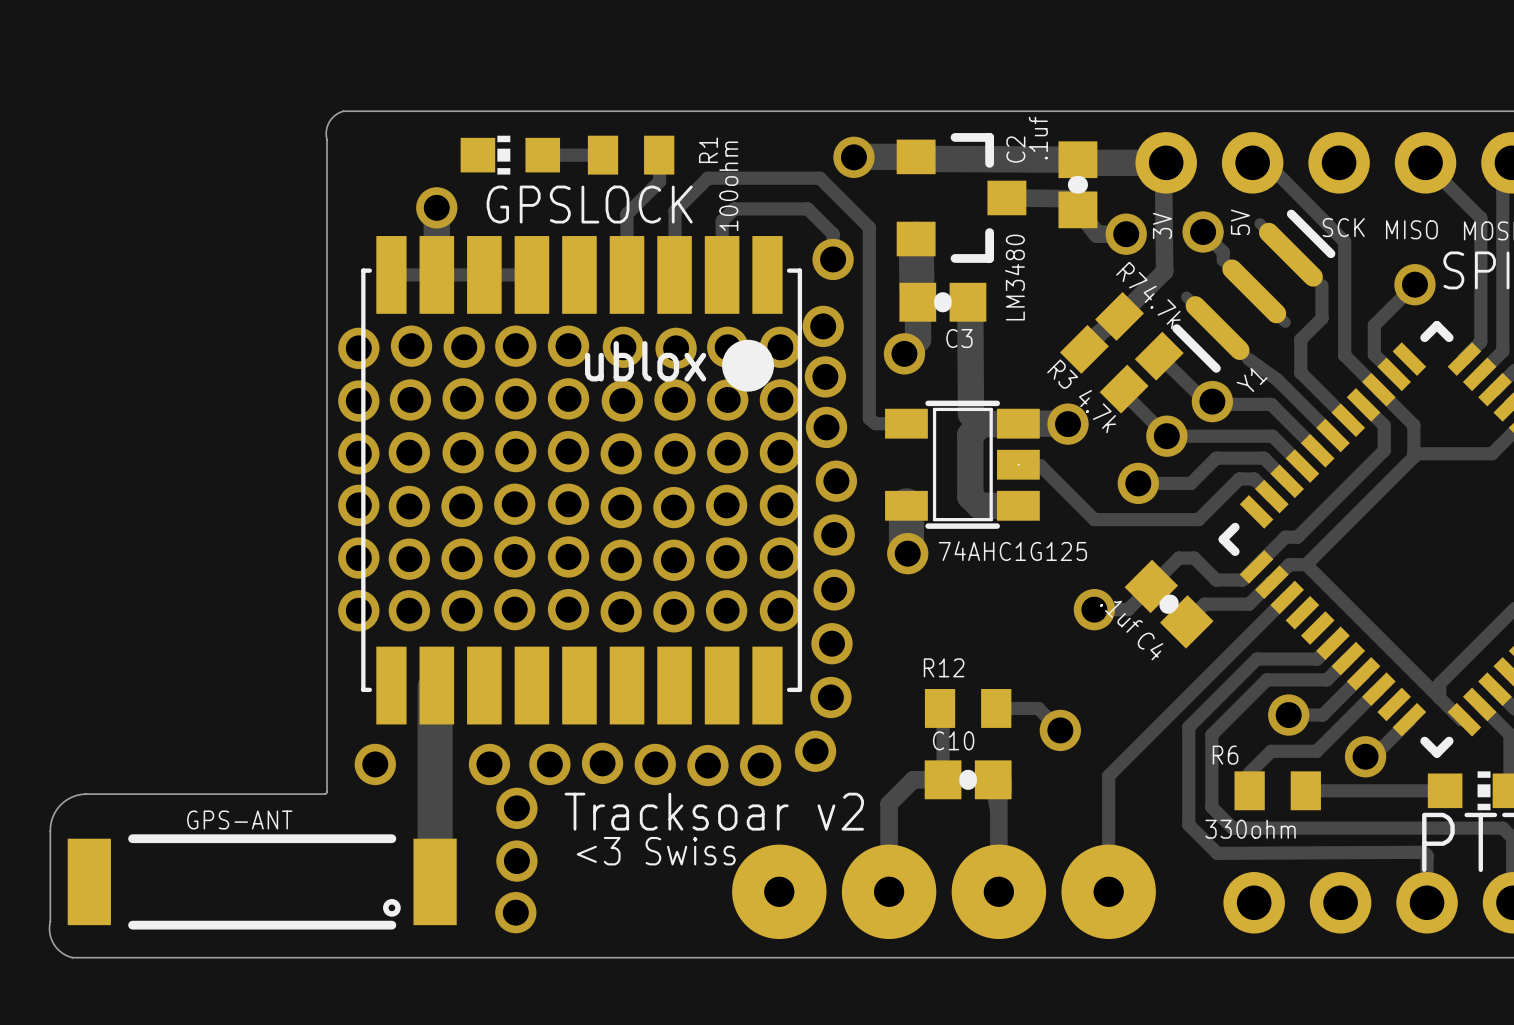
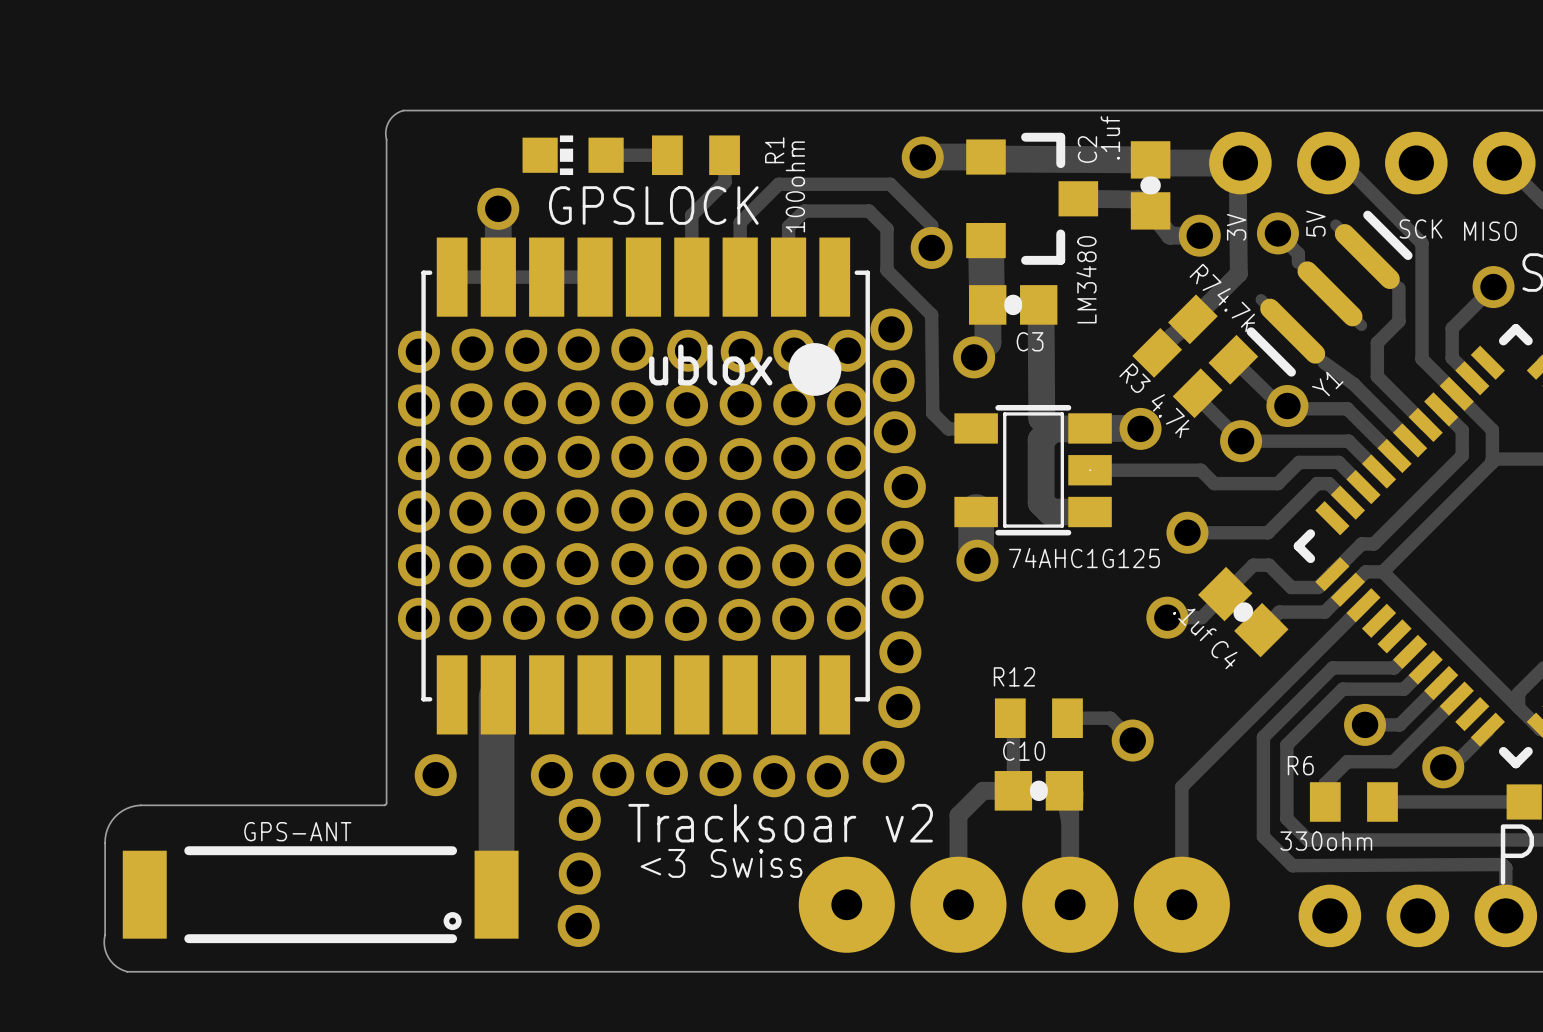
track: none -> (931, 247) (931, 225) (890, 184) (778, 184) (740, 222) (740, 277)
track: (833, 259) (833, 234) (807, 208) (734, 208) (722, 221) (722, 274) -> none
via position: (833, 259) -> (931, 247)
track: (675, 274) (675, 211) (707, 178) (819, 178) (869, 227) (869, 418) (875, 423) (906, 423) -> (788, 277) (788, 226) (804, 211) (869, 211) (886, 228) (886, 270) (931, 314) (932, 413) (948, 428) (975, 428)
track: (1263, 458) (1216, 458) (1191, 483) (1138, 483) -> none
track: (1018, 464) (1040, 465) (1094, 519) (1198, 519) (1239, 479) (1254, 479) -> (1090, 470) (1200, 470) (1214, 483) (1277, 483) (1299, 462) (1339, 463)
track: none -> (1330, 484) (1317, 483) (1267, 532) (1187, 532)
via position: (1138, 483) -> (1187, 532)

